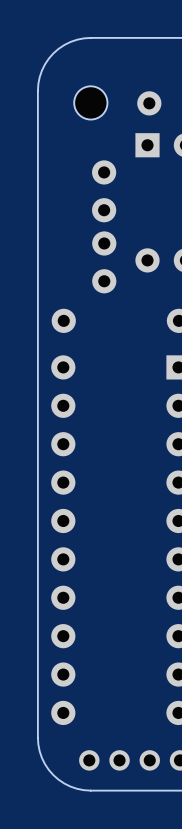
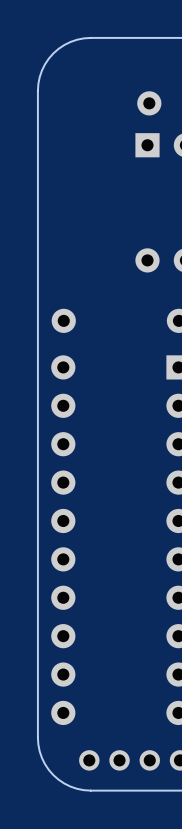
part: (90, 102) -> none
part: (104, 191) -> none
part: (104, 262) -> none

